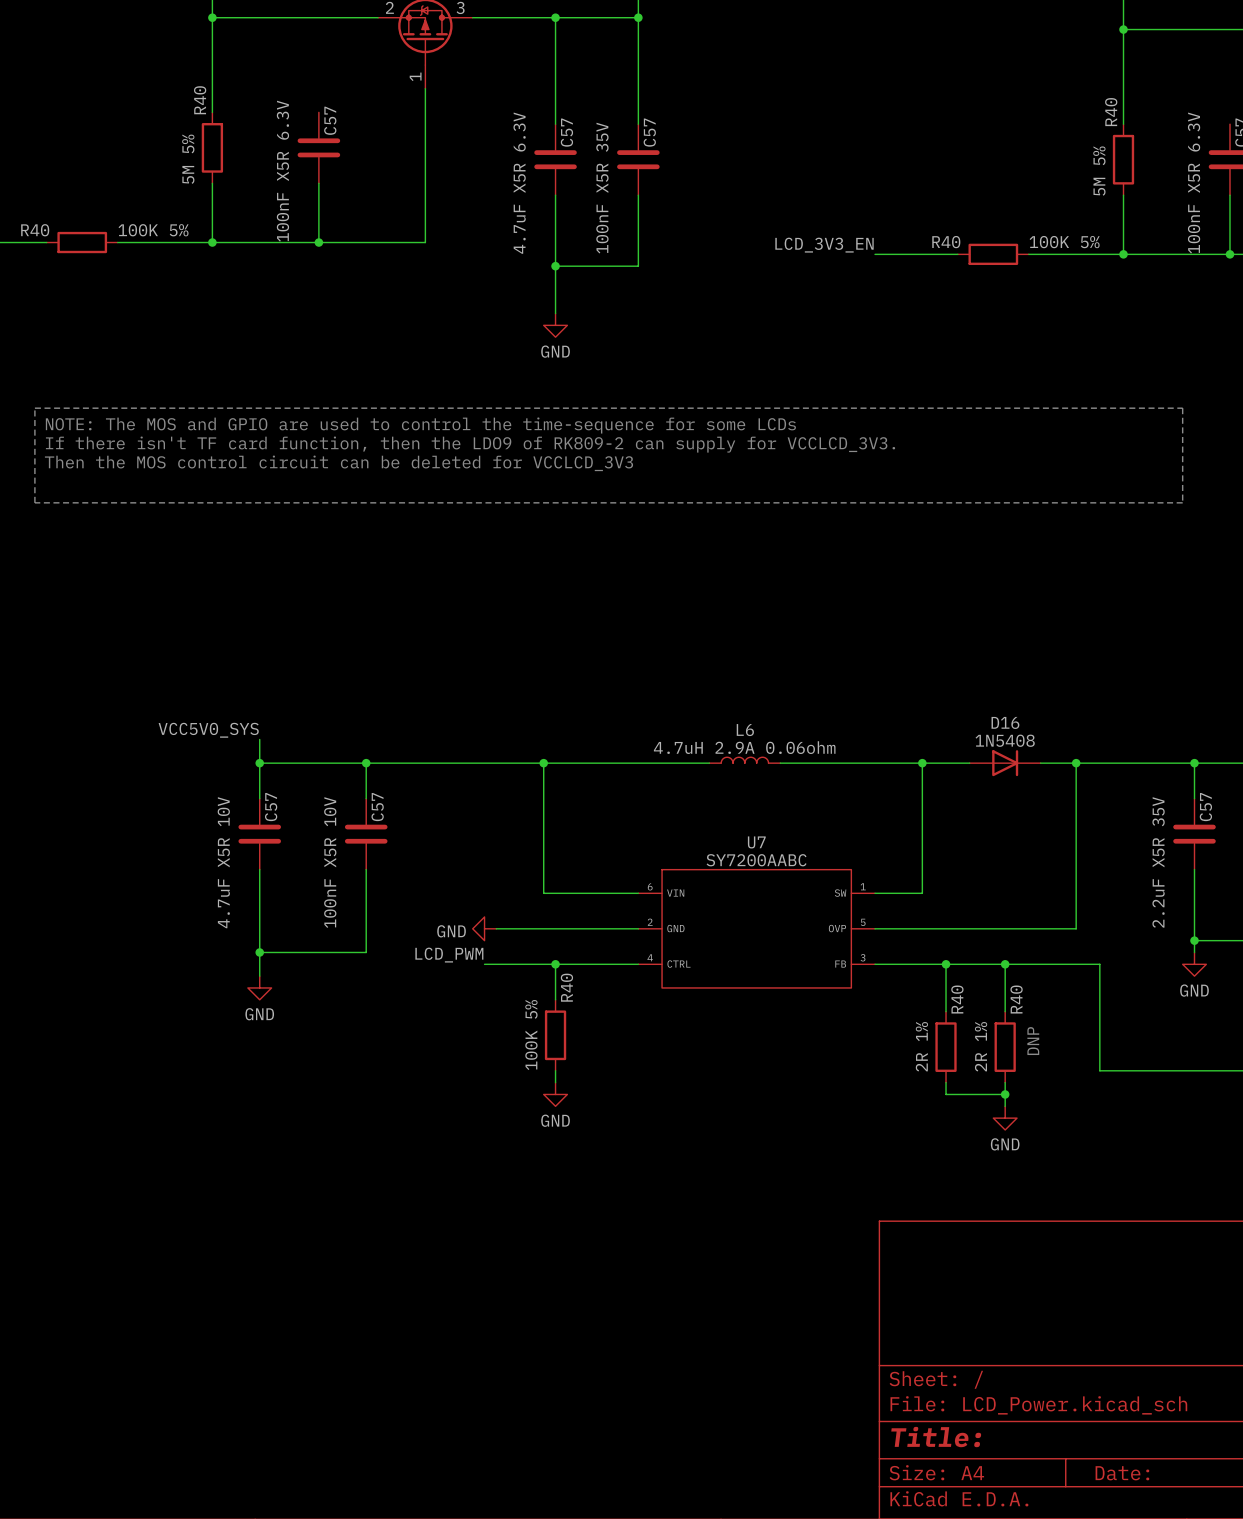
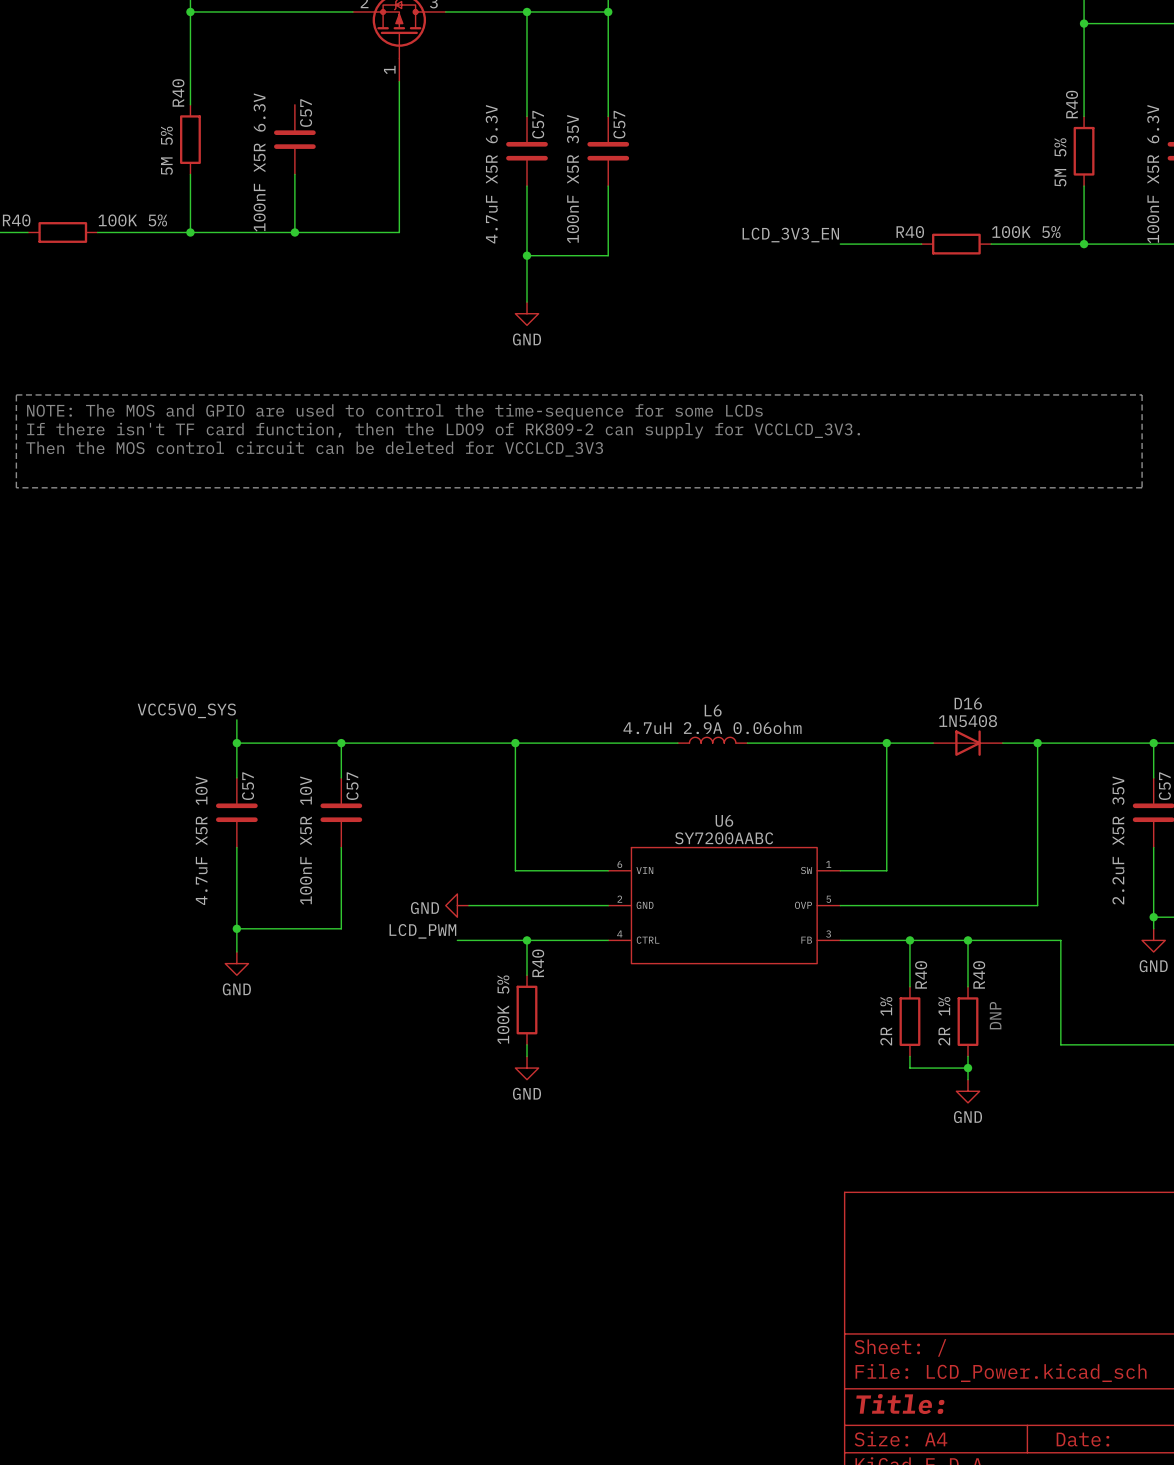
U7 name: U7 (756, 842) -> U6 (724, 820)

